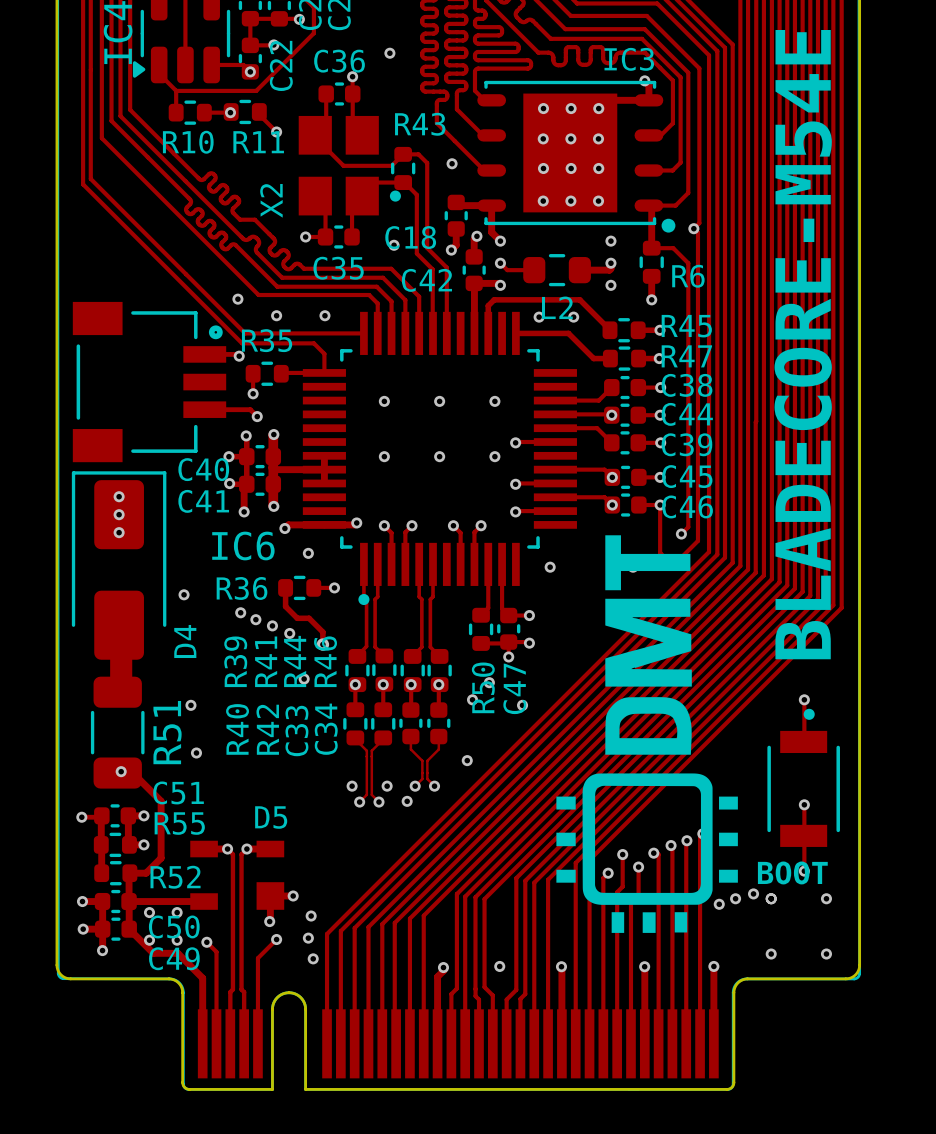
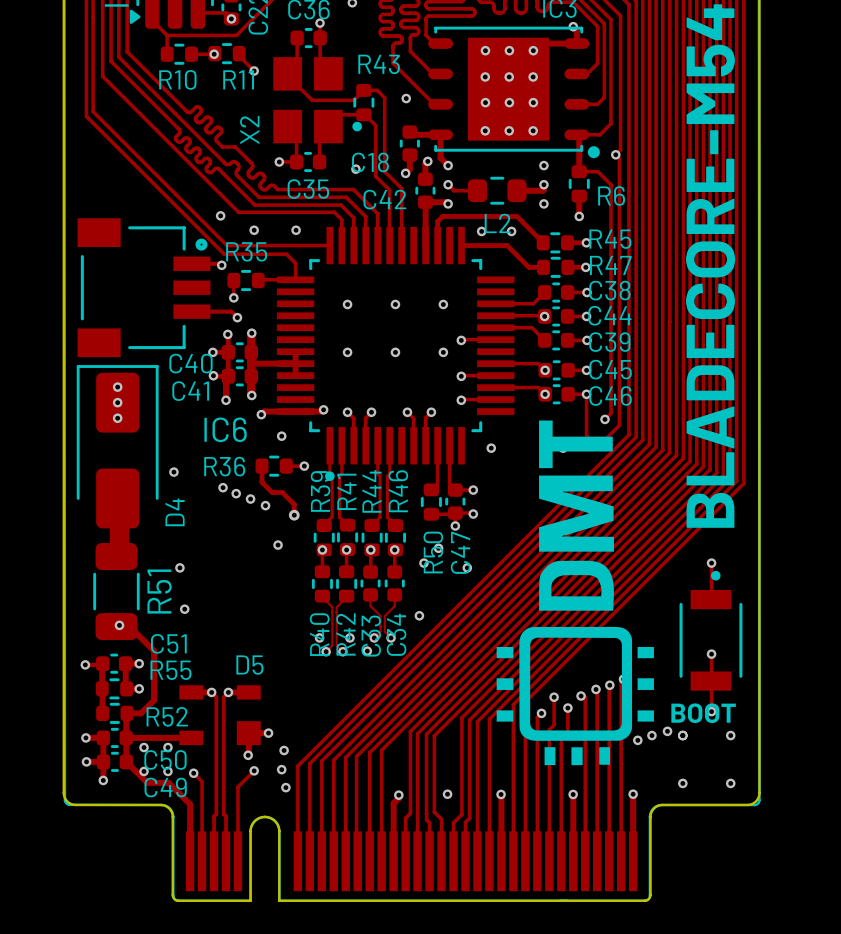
R39 name position: R39 (235, 661) -> R39 (320, 491)
R41 name position: R41 (266, 661) -> R41 (346, 491)
R44 name position: R44 (295, 661) -> R44 (371, 491)
R46 name position: R46 (325, 661) -> R46 (398, 491)
R40 name position: R40 (237, 729) -> R40 (319, 634)
R42 name position: R42 (267, 729) -> R42 (345, 634)
C34 name position: C34 (326, 729) -> C34 (396, 634)
C33 name position: C33 (296, 731) -> C33 (371, 636)

